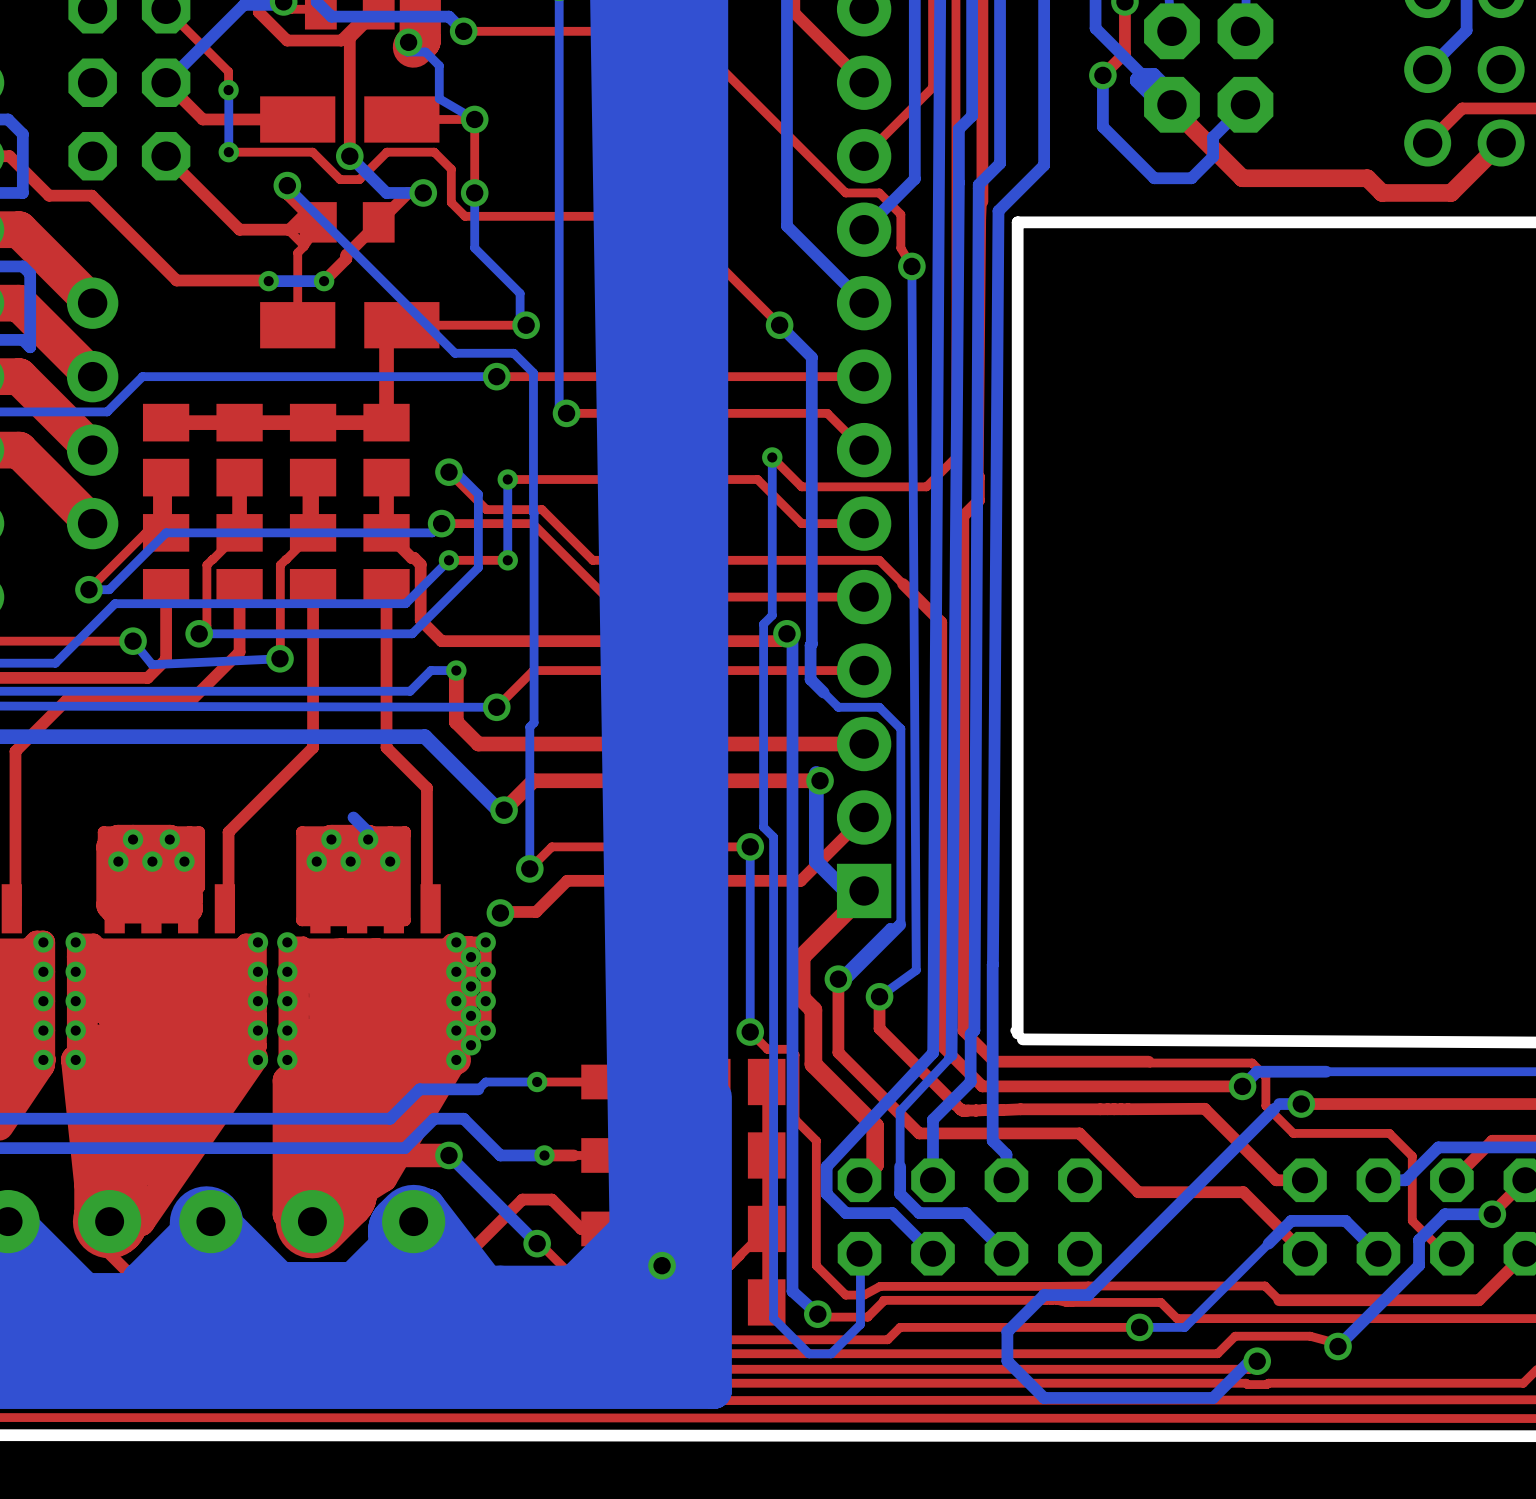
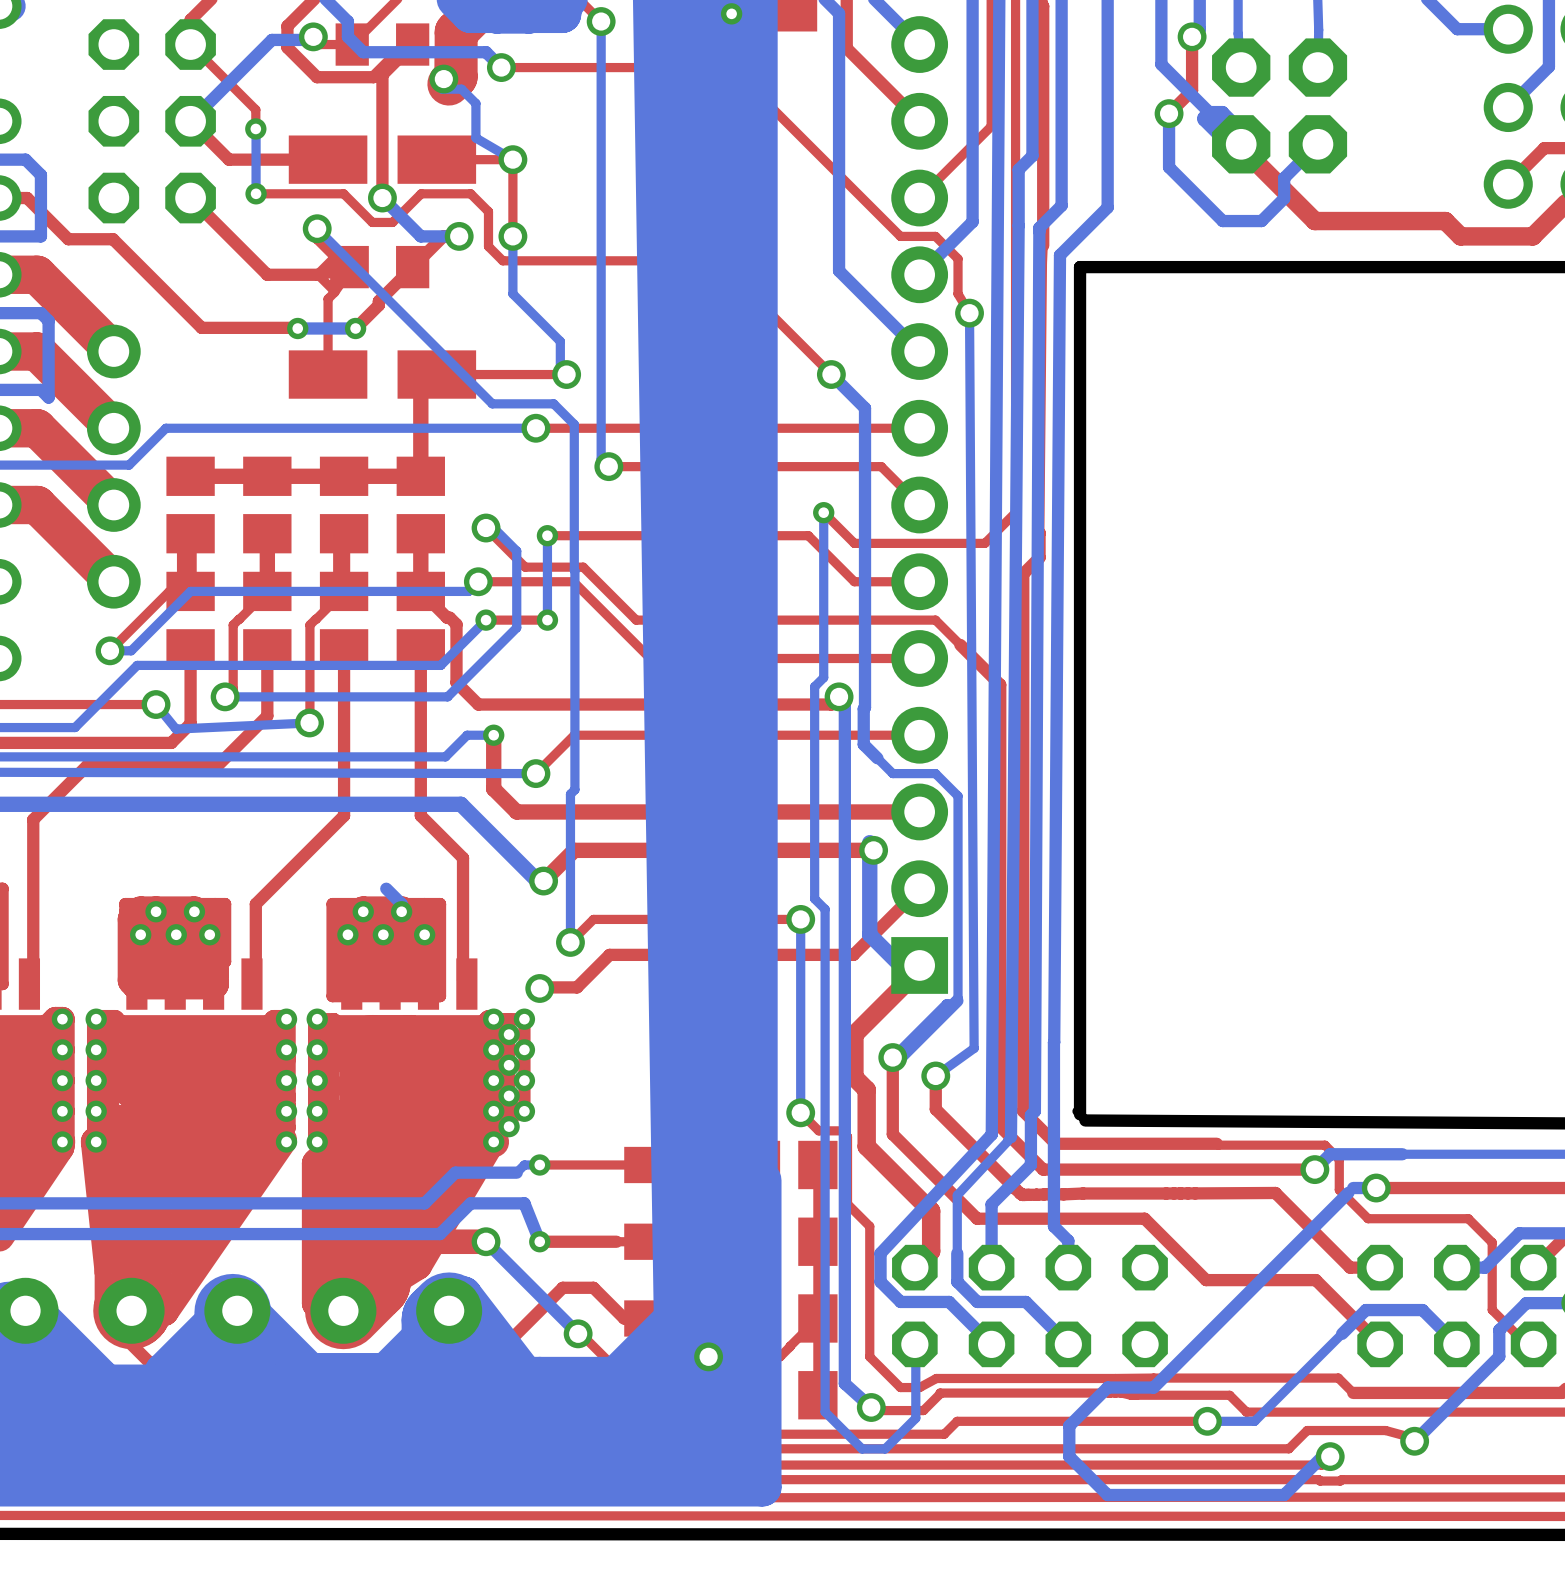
top track: none -> (578, 1164) (539, 1164)
bottom track: (537, 1082) (500, 1082) -> none
via position: (537, 1082) -> (539, 1164)
bottom track: (463, 1118) (500, 1155) (544, 1155) -> (501, 1203) (524, 1203) (539, 1241)
via: none -> (539, 1241)
top track: none -> (585, 1241) (539, 1241)
via: (544, 1155) -> none

